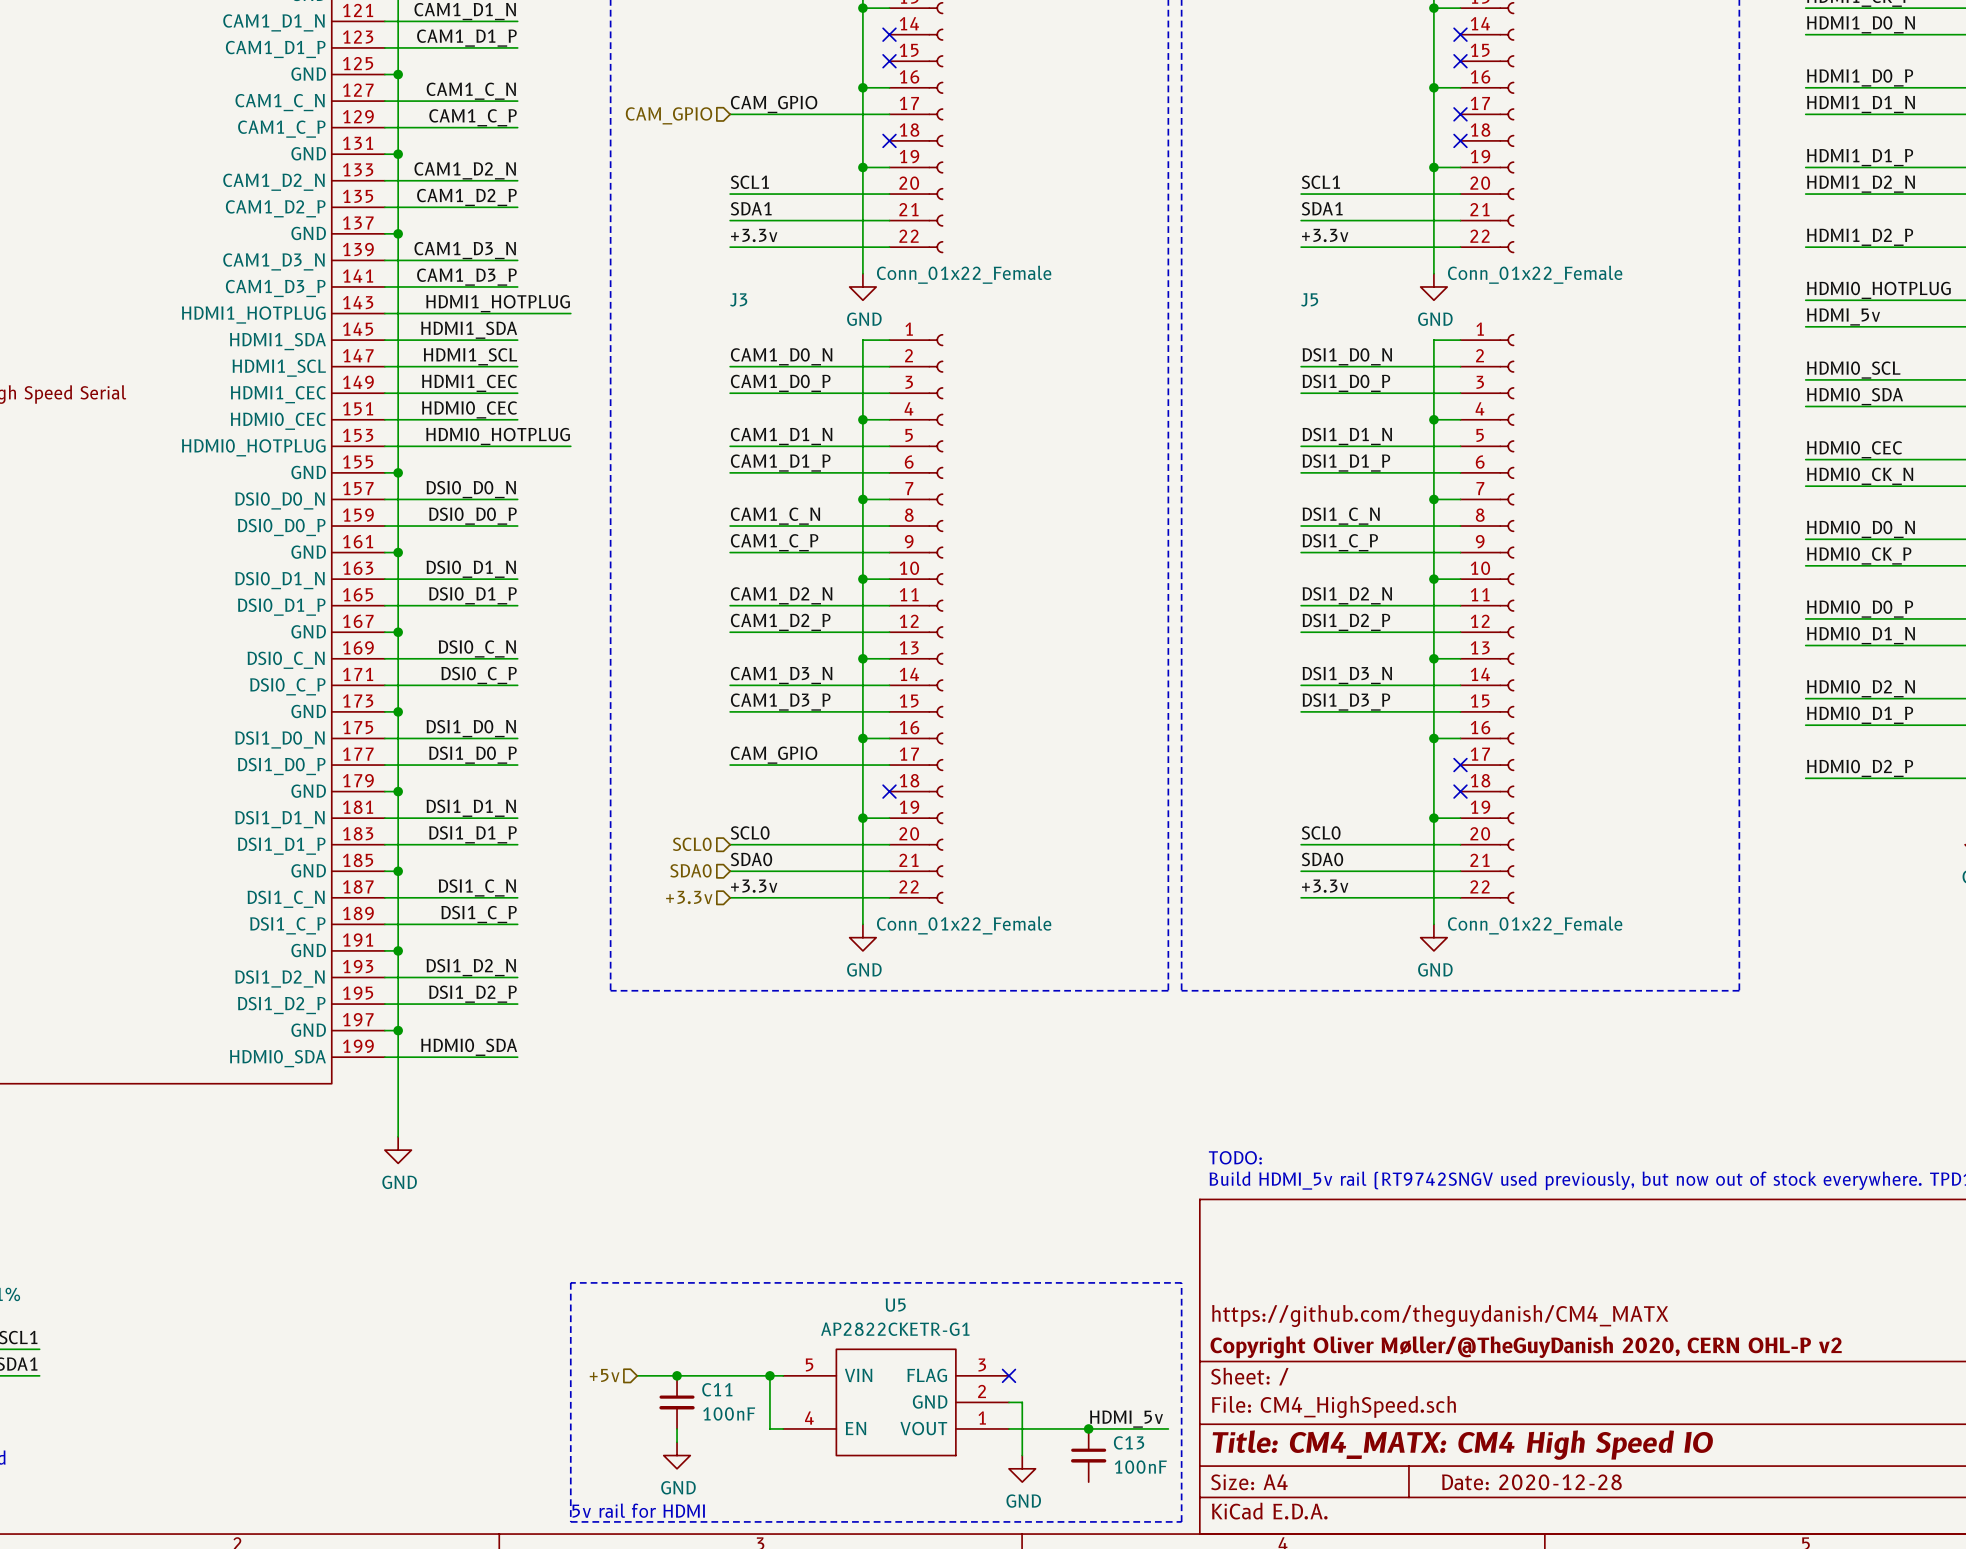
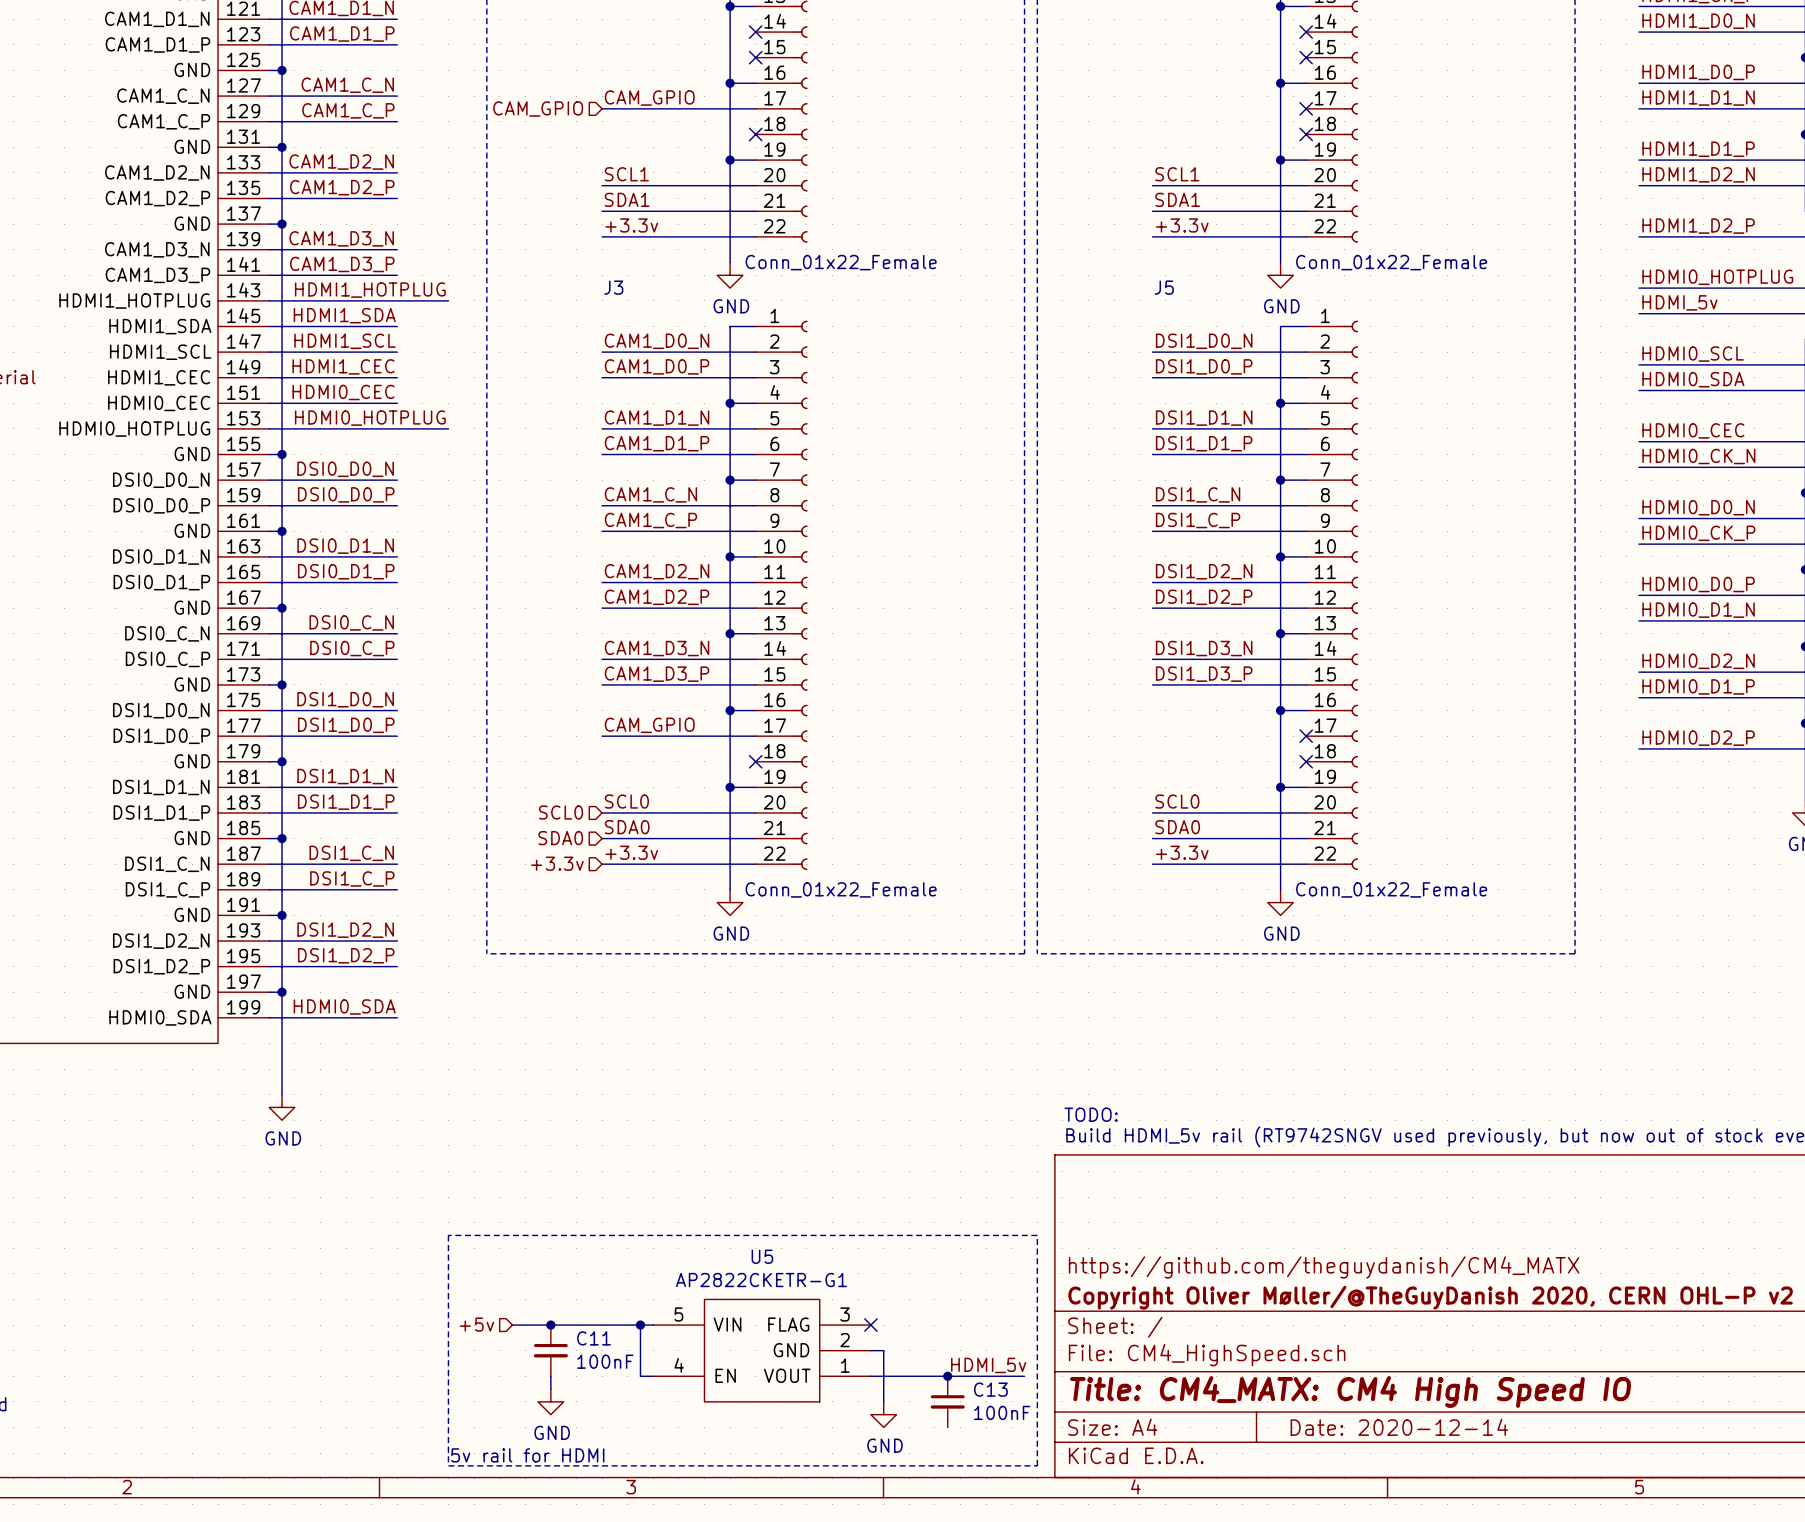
title block: Date: 2020-12-28 (1531, 1482) -> Date: 2020-12-14 (1399, 1427)

